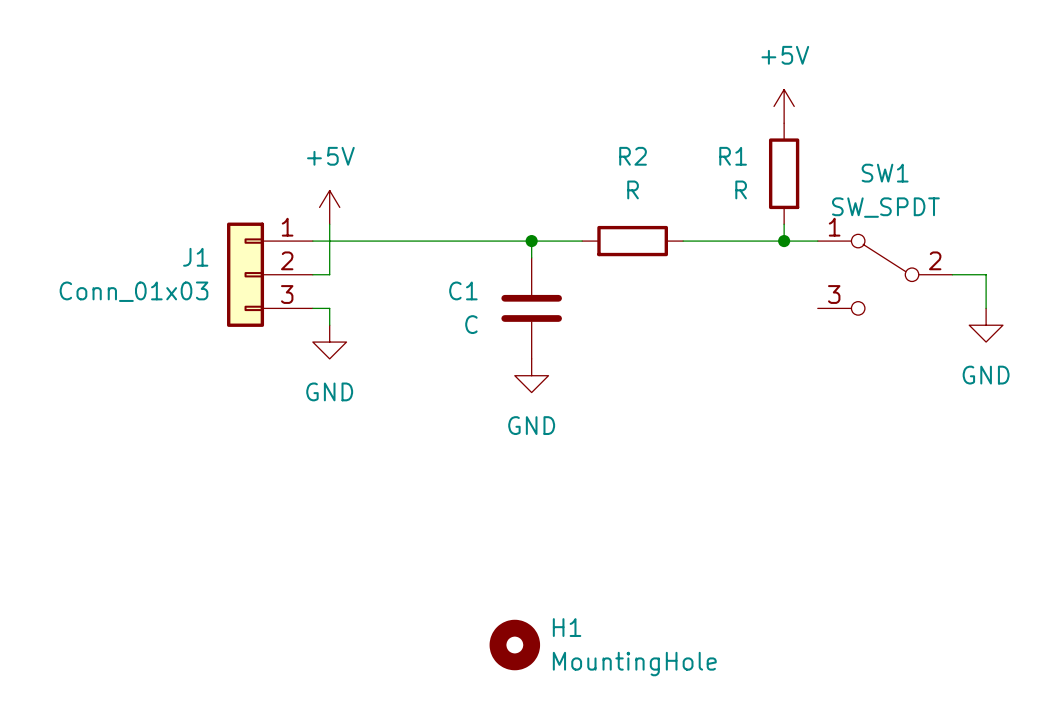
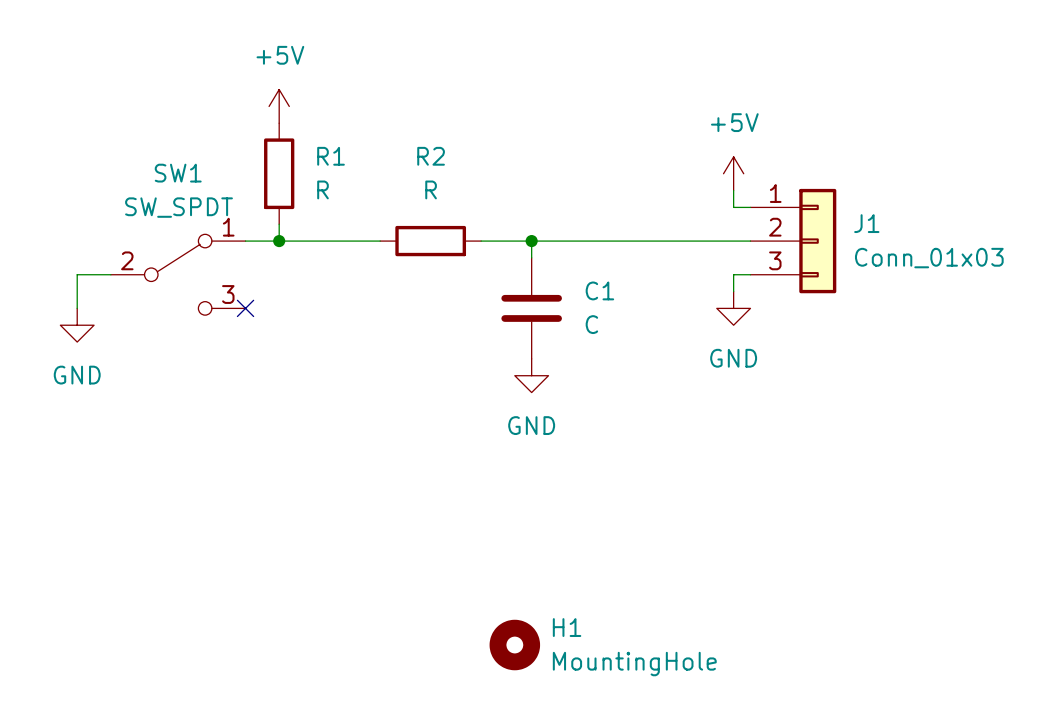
power symbol position: +5V (784, 106) -> +5V (733, 173)
R1 name position: R1 (733, 156) -> R1 (331, 156)
R1 position: (784, 173) -> (279, 173)
R1 value position: R (741, 189) -> R (323, 189)
wire: none -> (733, 190) (733, 207) (750, 207)
power symbol position: +5V (329, 207) -> +5V (279, 106)
wire: none -> (279, 224) (279, 241)
wire: (329, 224) (329, 274) (312, 274) -> none
wire: (784, 224) (784, 241) -> none
junction: none -> (279, 241)
wire: (380, 241) (481, 241) -> (582, 241) (683, 241)
R2 position: (632, 241) -> (430, 241)
junction: (784, 241) -> none
wire: none -> (110, 274) (77, 274) (77, 308)
J1 flip: as is (245, 274) -> left-right (817, 241)
J1 position: (269, 274) -> (793, 241)
wire: none -> (750, 274) (733, 274) (733, 291)
SW1 flip: as is (885, 274) -> left-right (178, 274)
SW1 position: (885, 274) -> (178, 274)
wire: (952, 274) (986, 274) (986, 308) -> none
C1 name position: C1 (463, 290) -> C1 (599, 290)
no-connect mark: none -> (245, 308)
wire: (312, 308) (329, 308) (329, 325) -> none
power symbol: none -> GND (733, 308)
C1 value position: C (471, 324) -> C (591, 324)
power symbol: none -> GND (77, 325)
power symbol: GND (986, 325) -> none
power symbol: GND (329, 342) -> none

